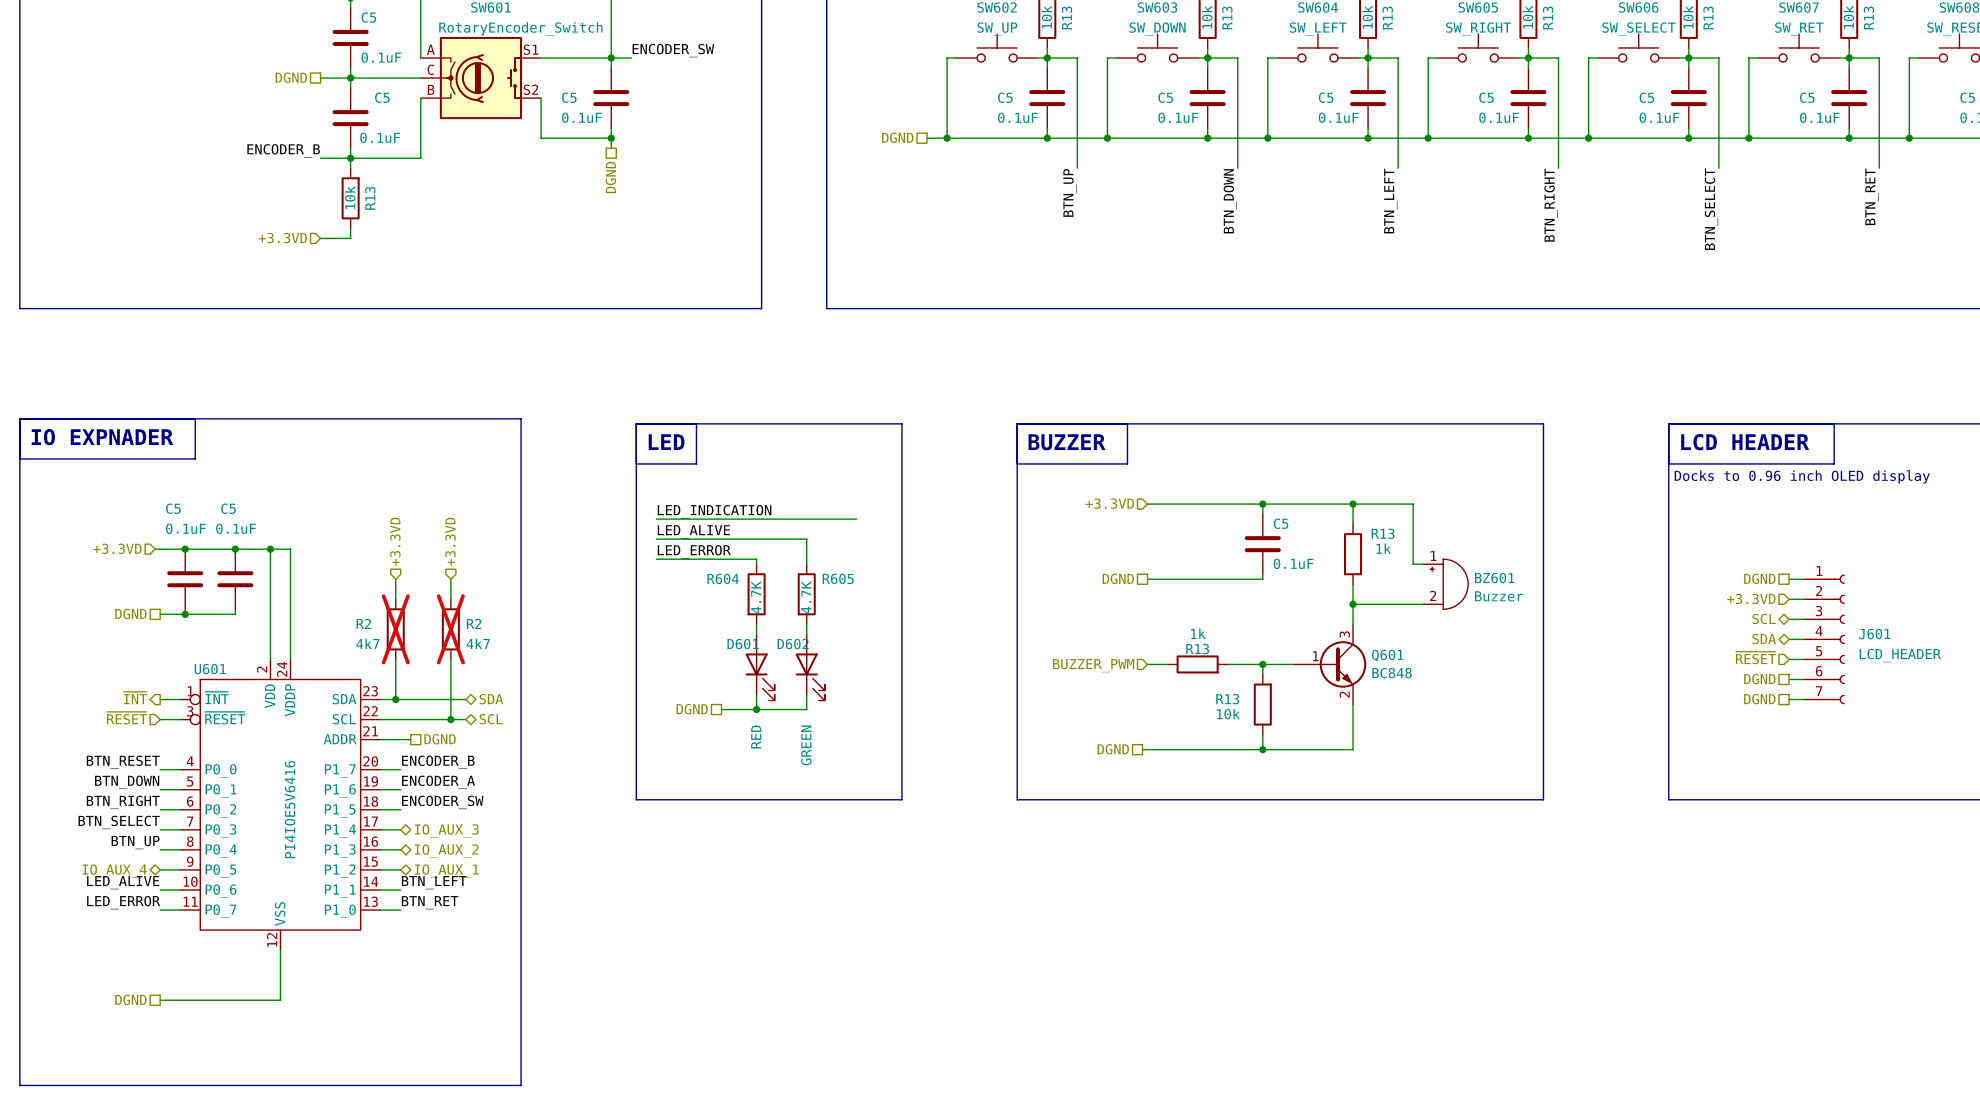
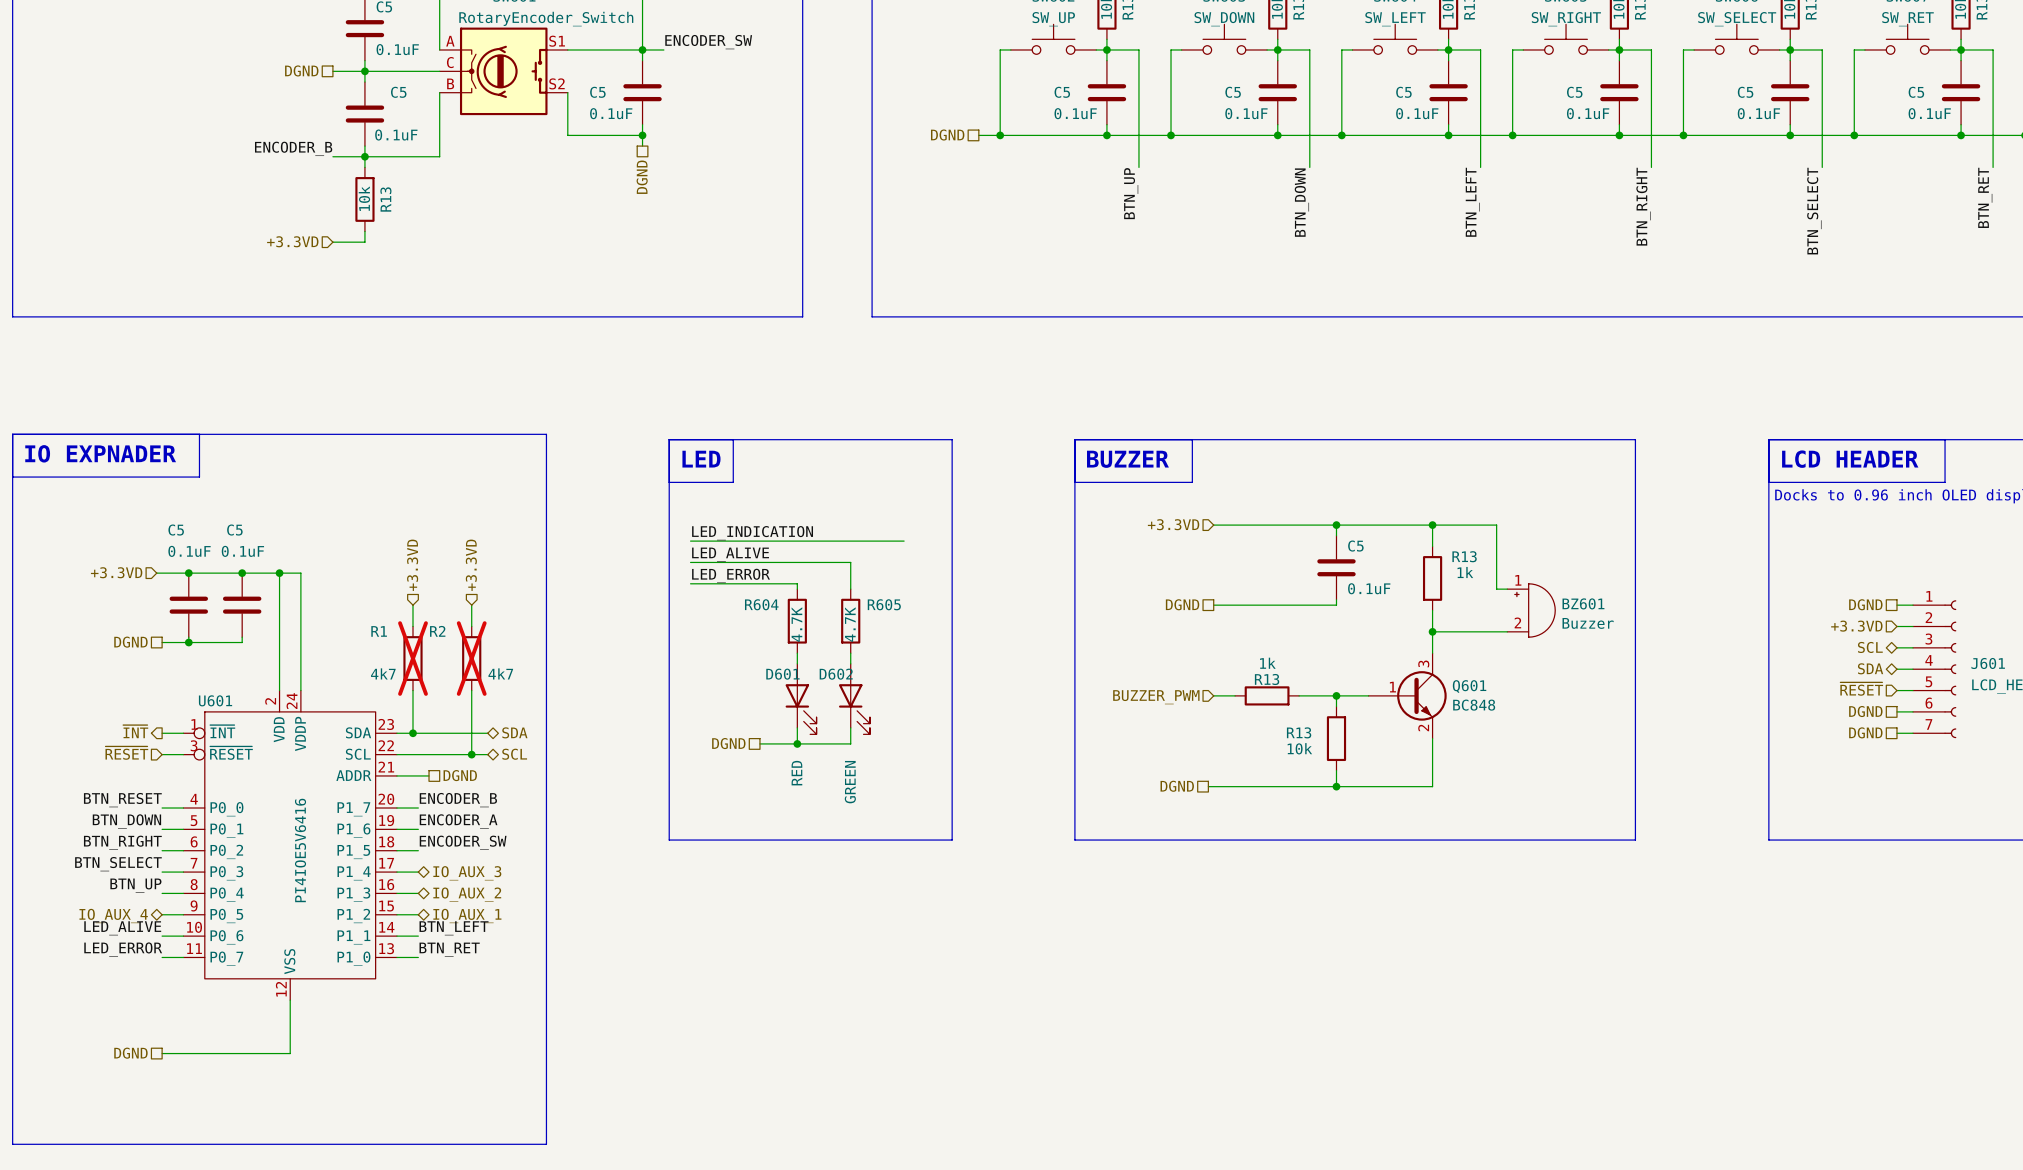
R2 name: R2 (363, 623) -> R1 (379, 631)
R2 name position: R2 (474, 623) -> R2 (437, 631)

